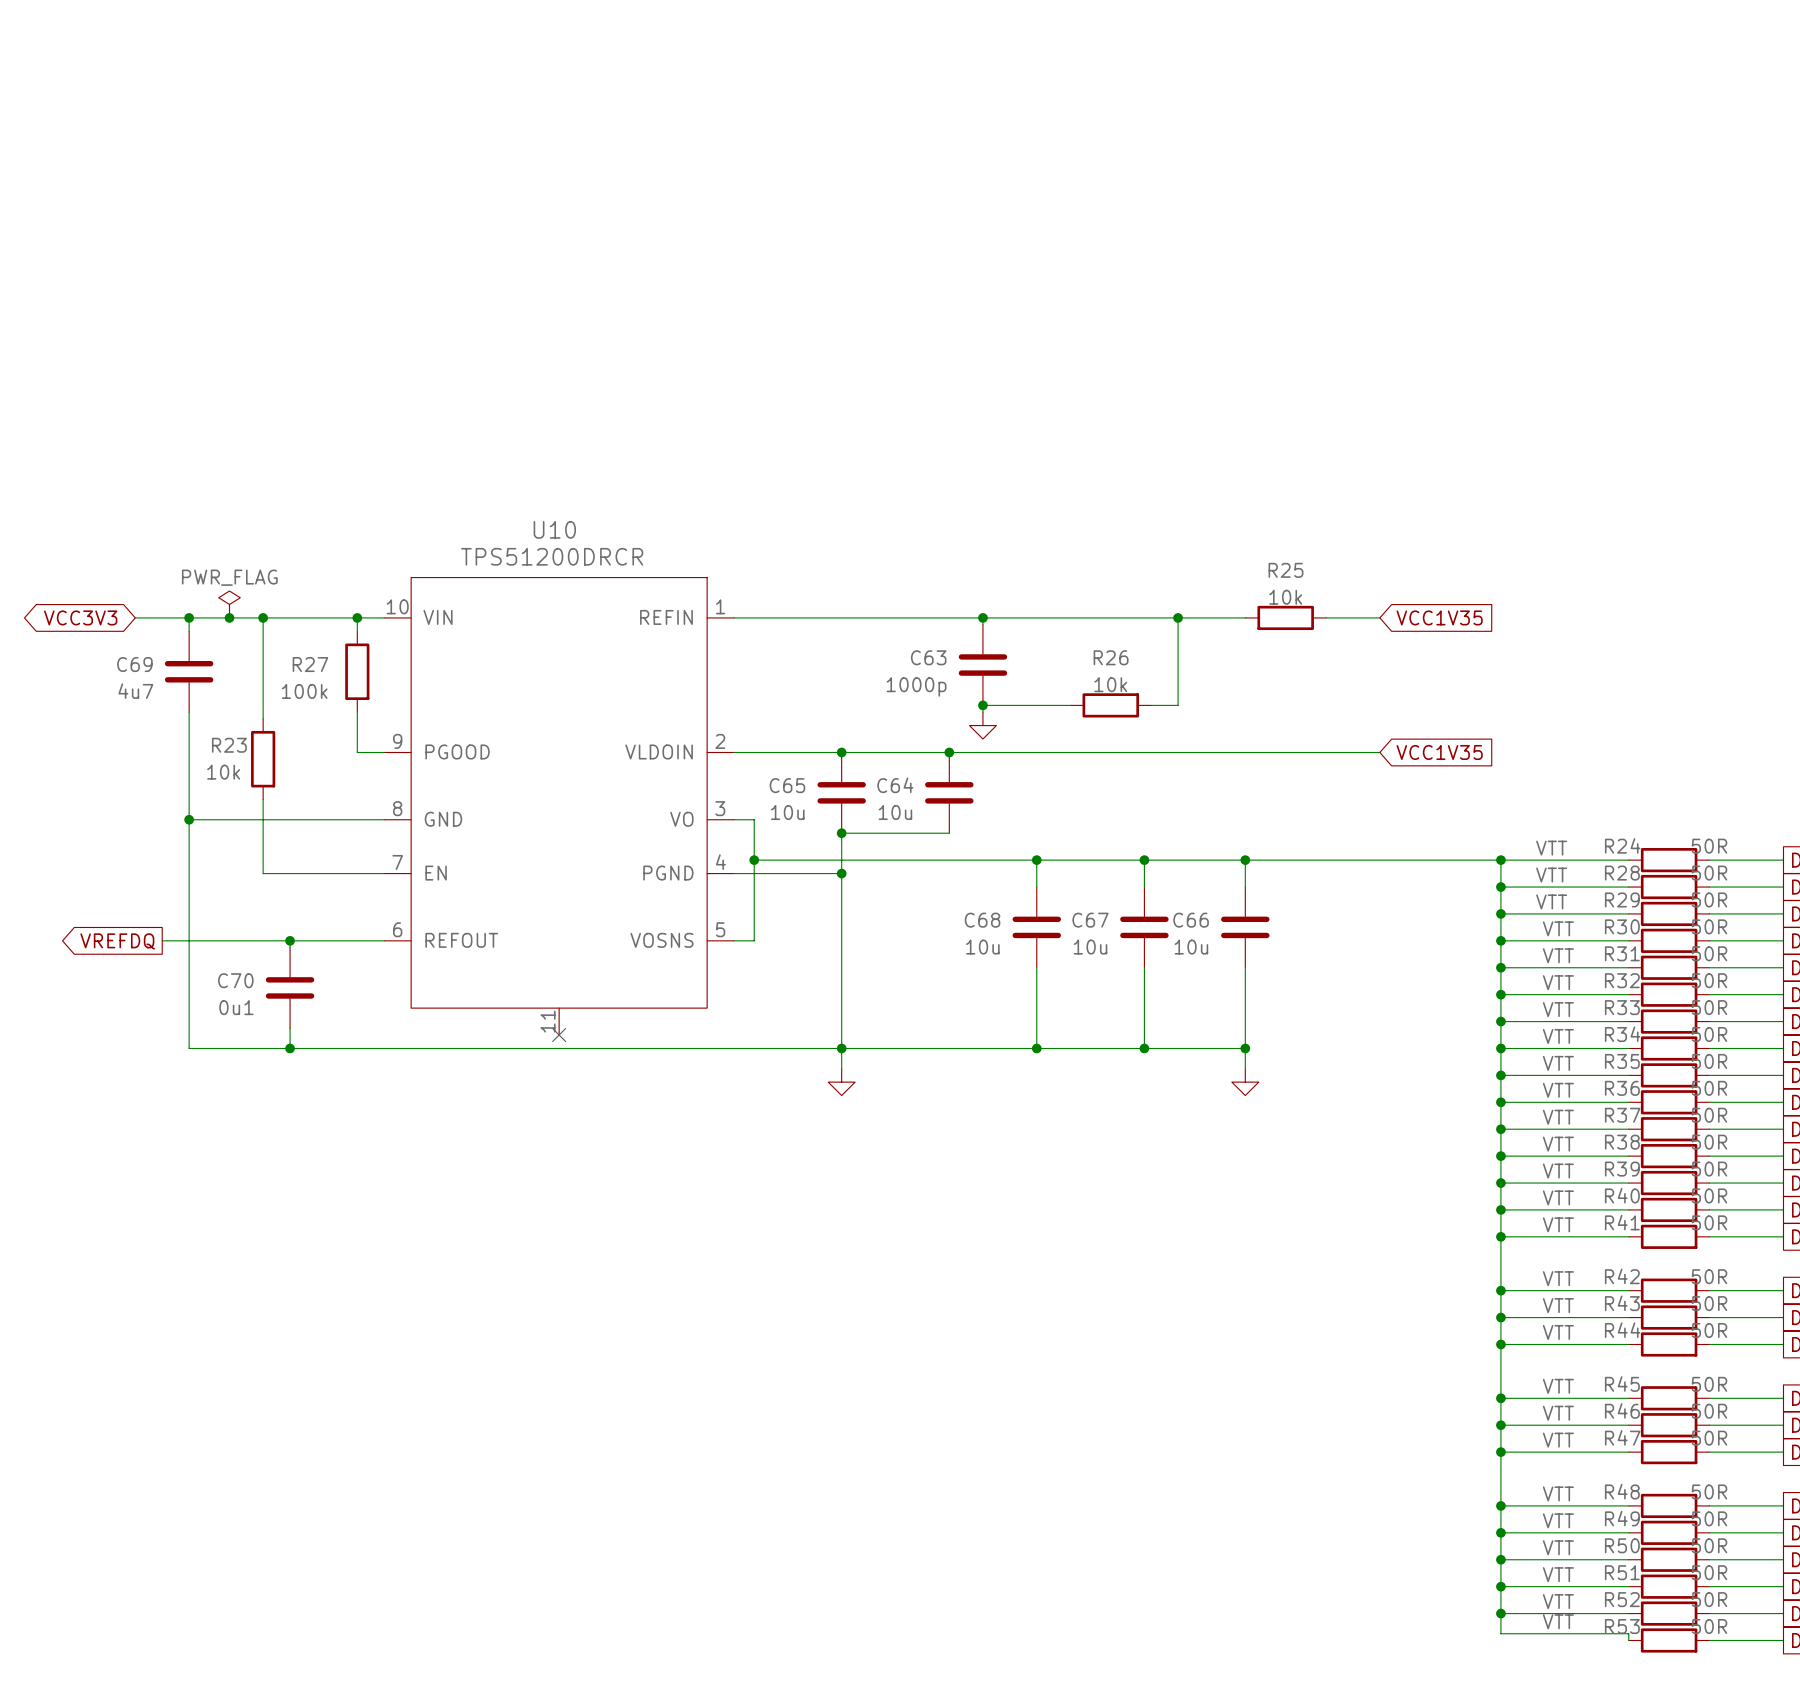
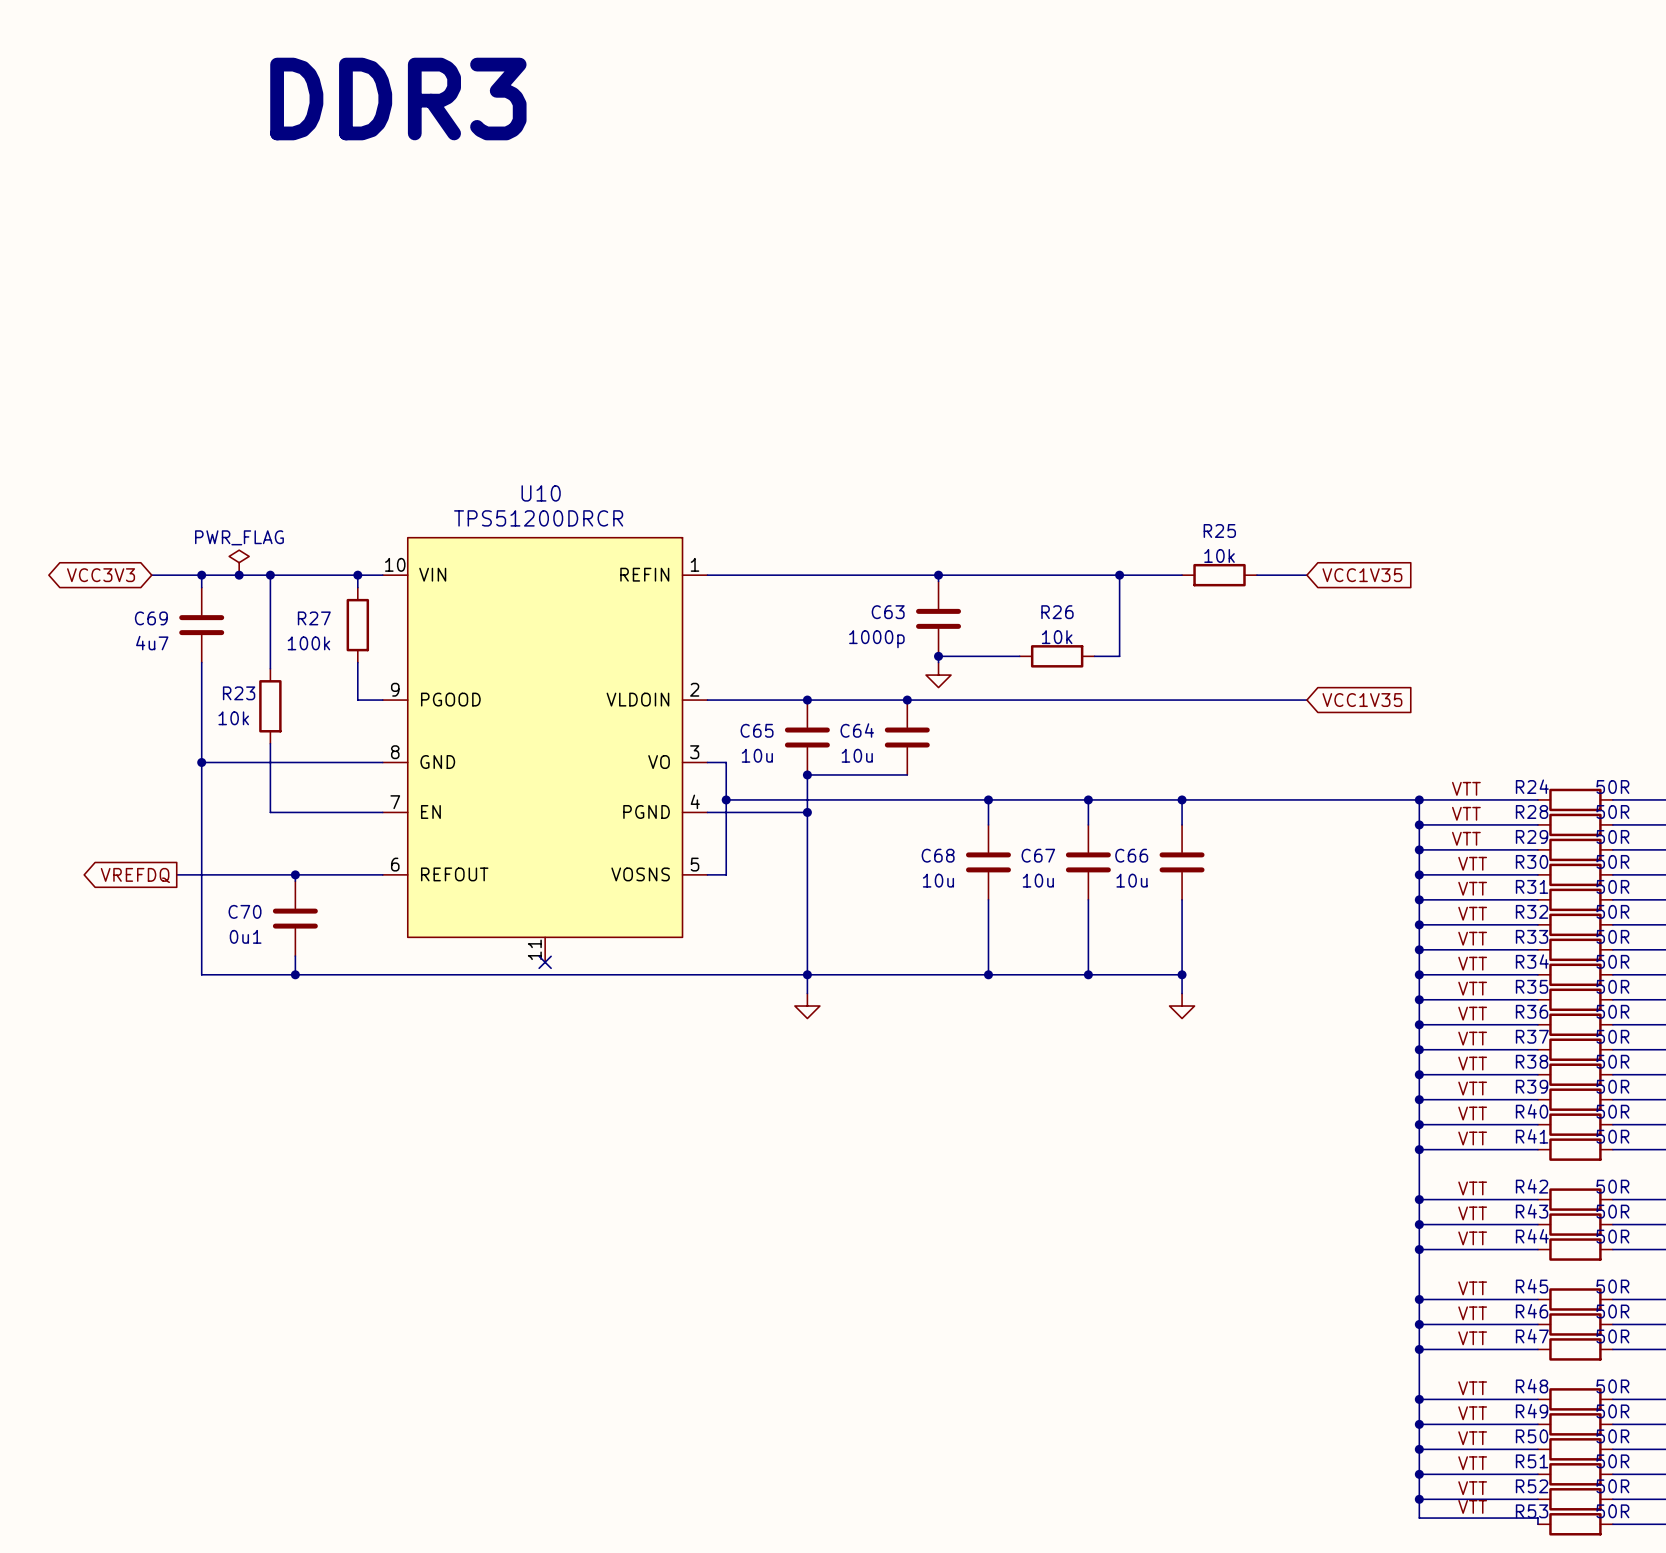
text: none -> DDR3 (398, 99)

